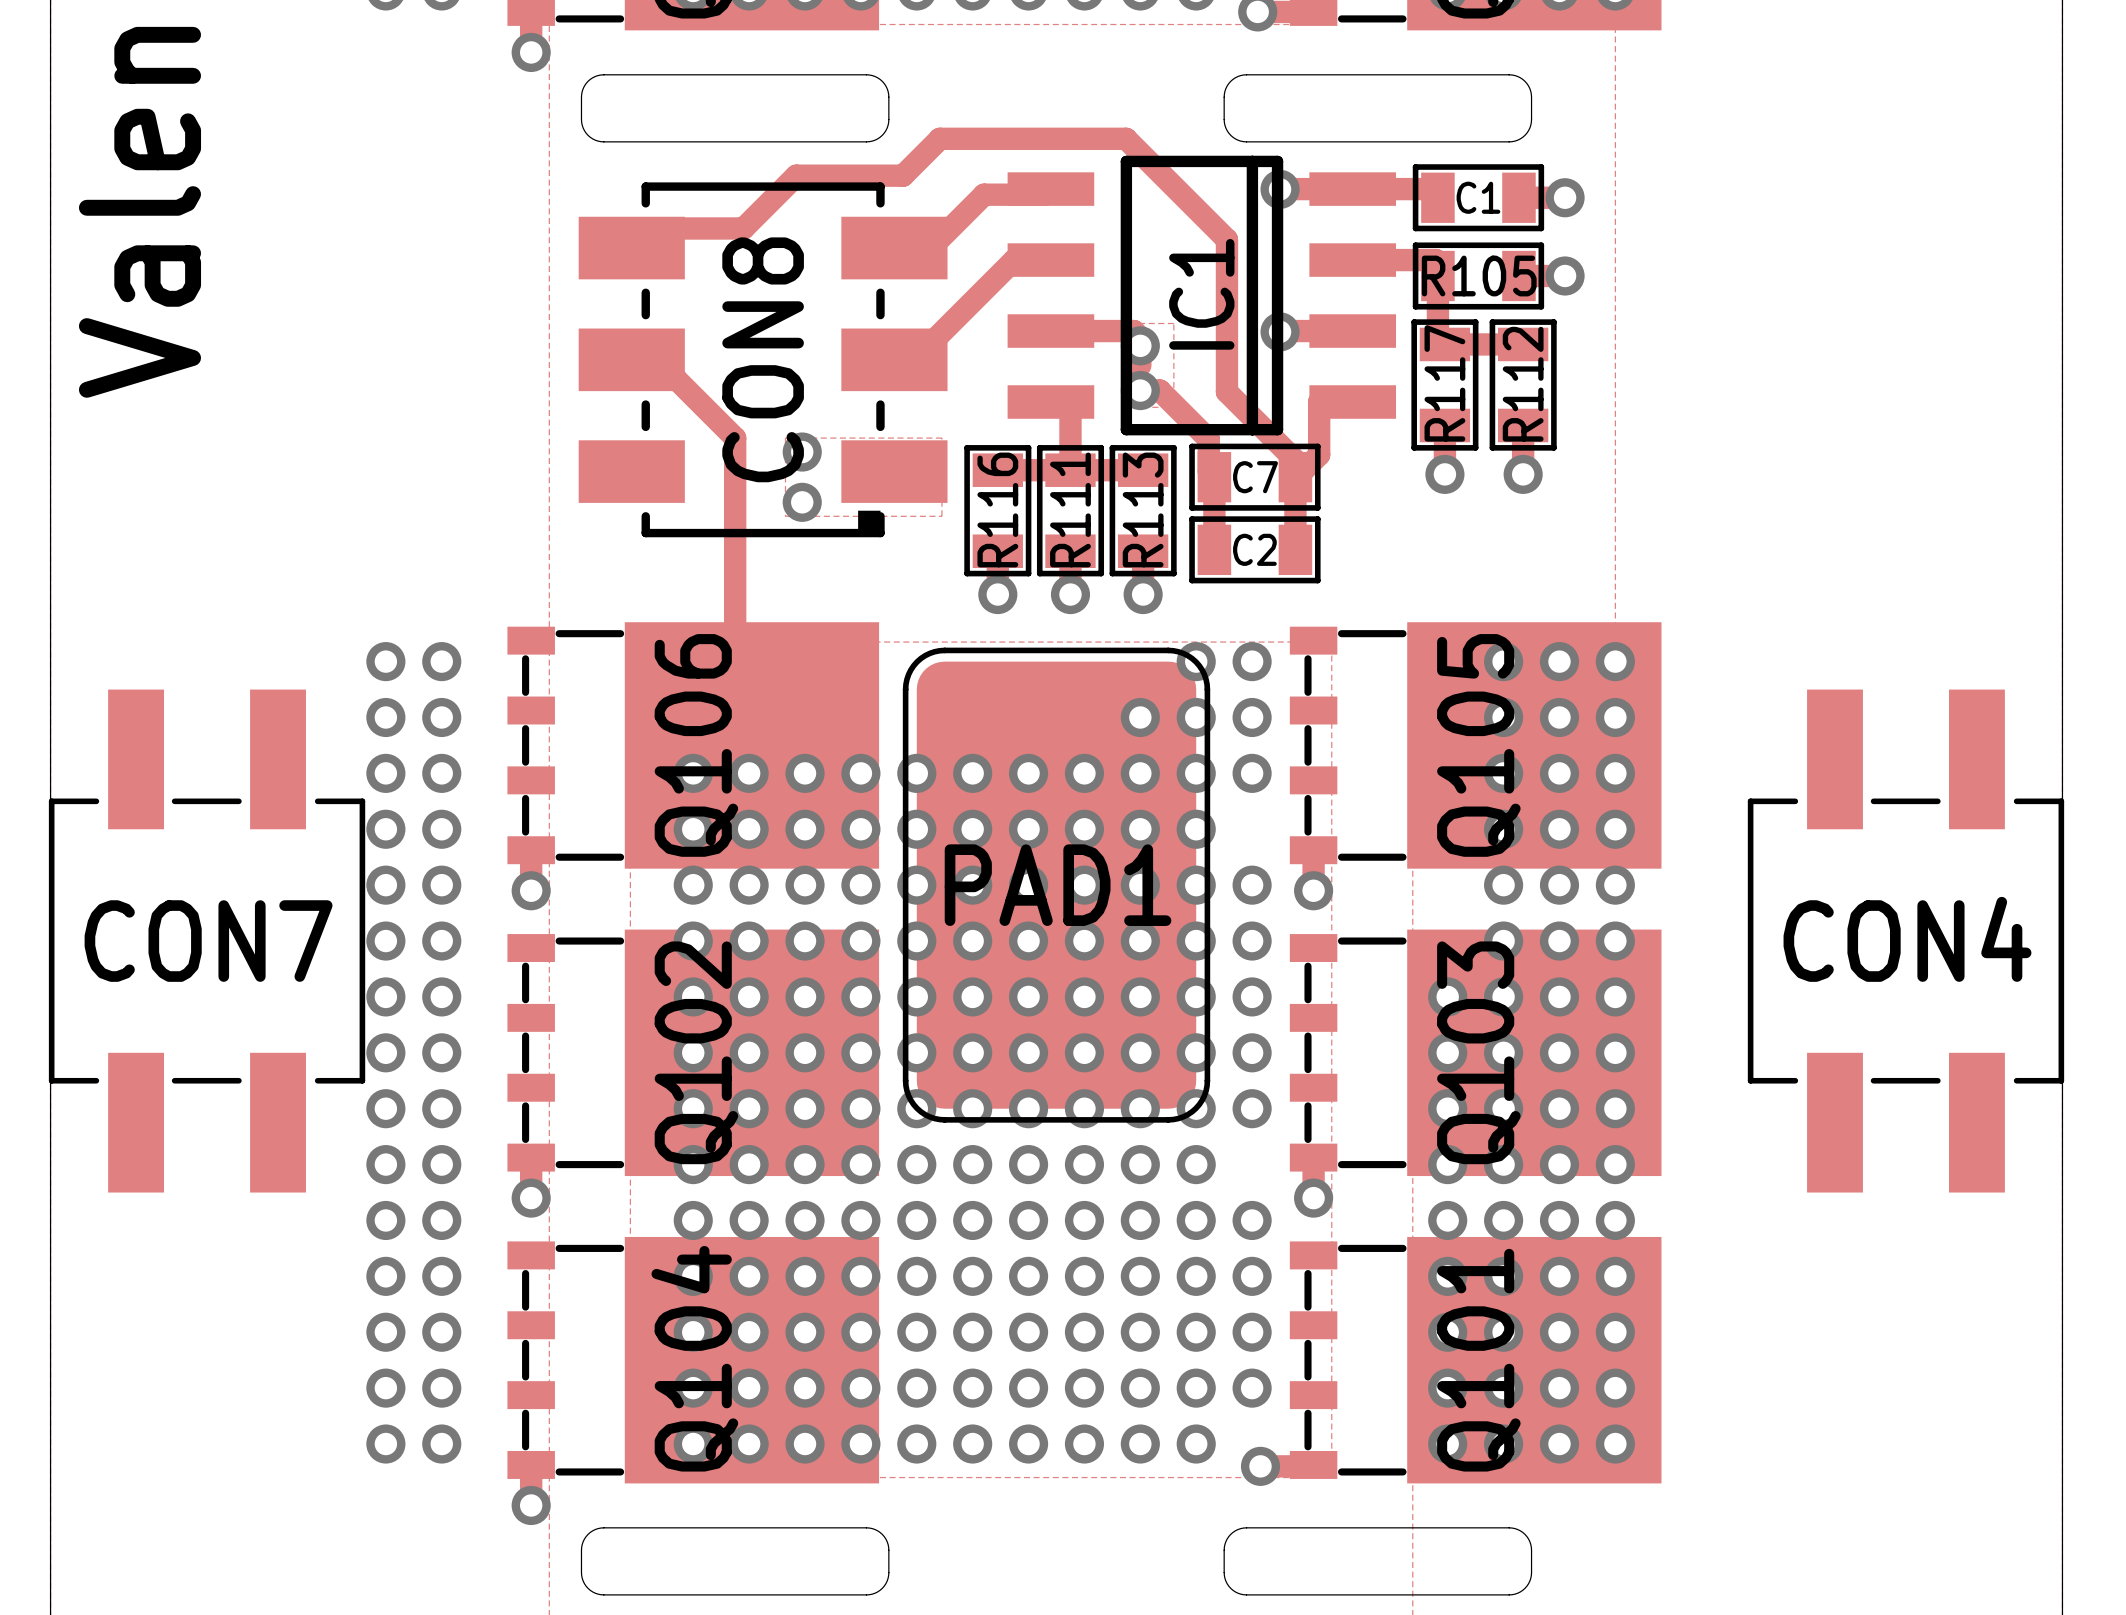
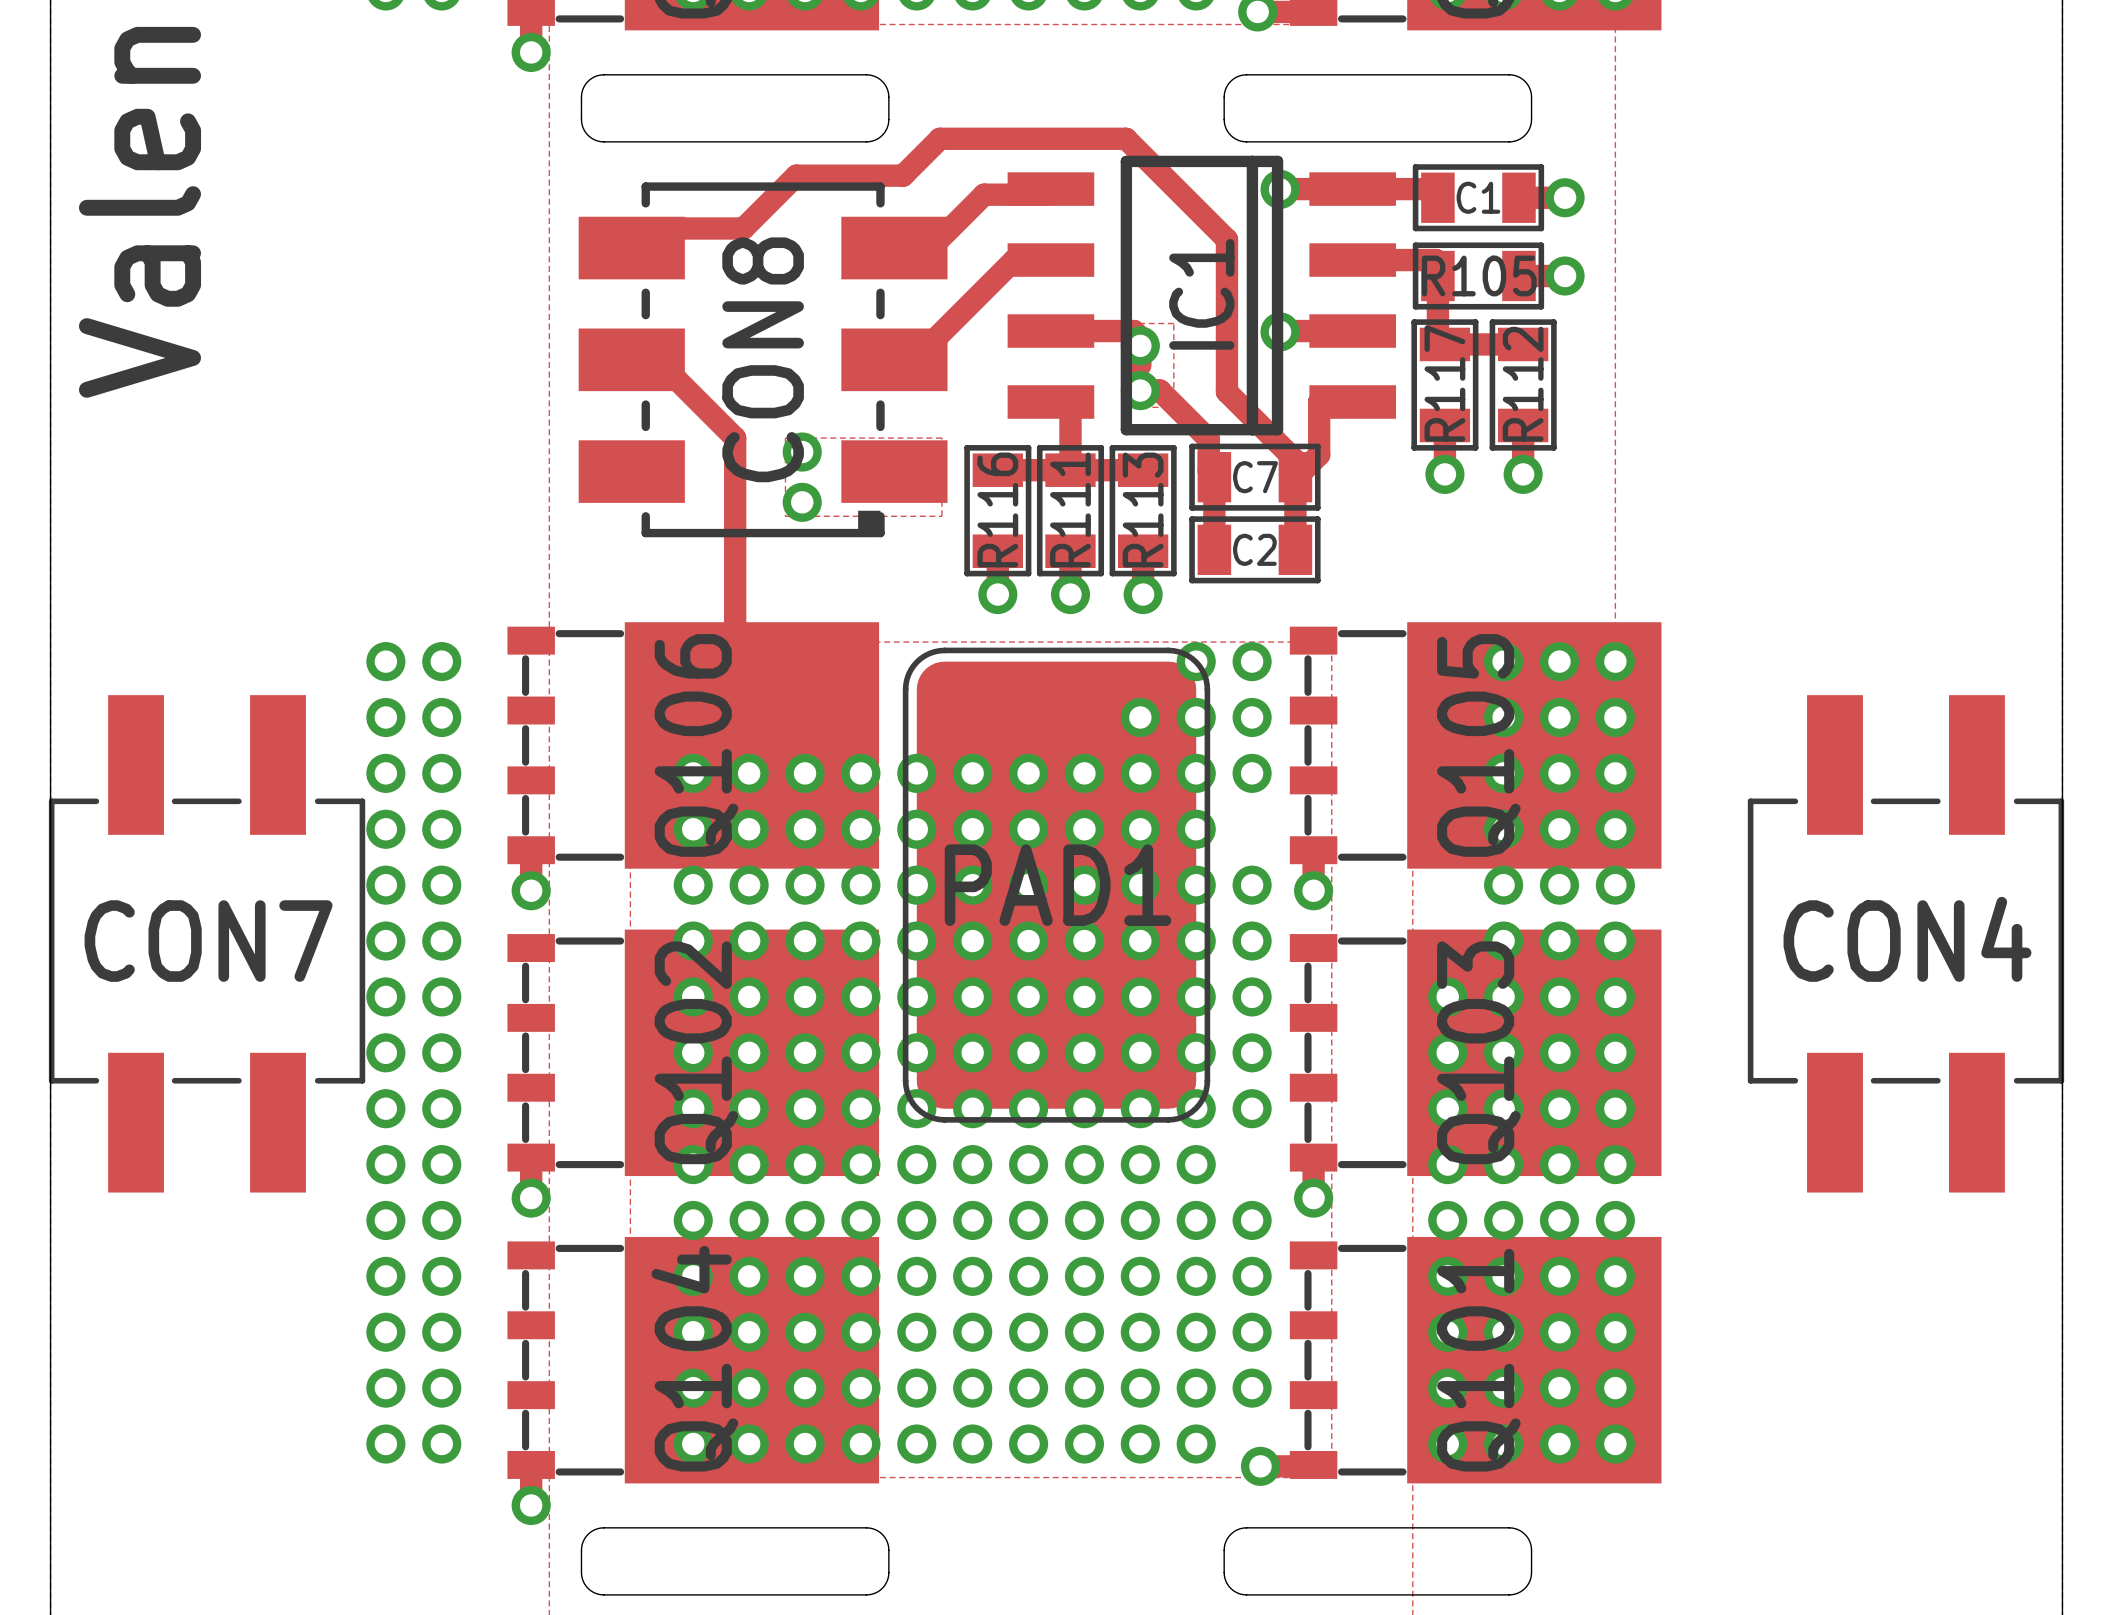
CON7 footprint: [48, 689, 366, 1193] -> [48, 695, 366, 1193]
CON4 footprint: [1747, 689, 2065, 1193] -> [1747, 695, 2065, 1193]

